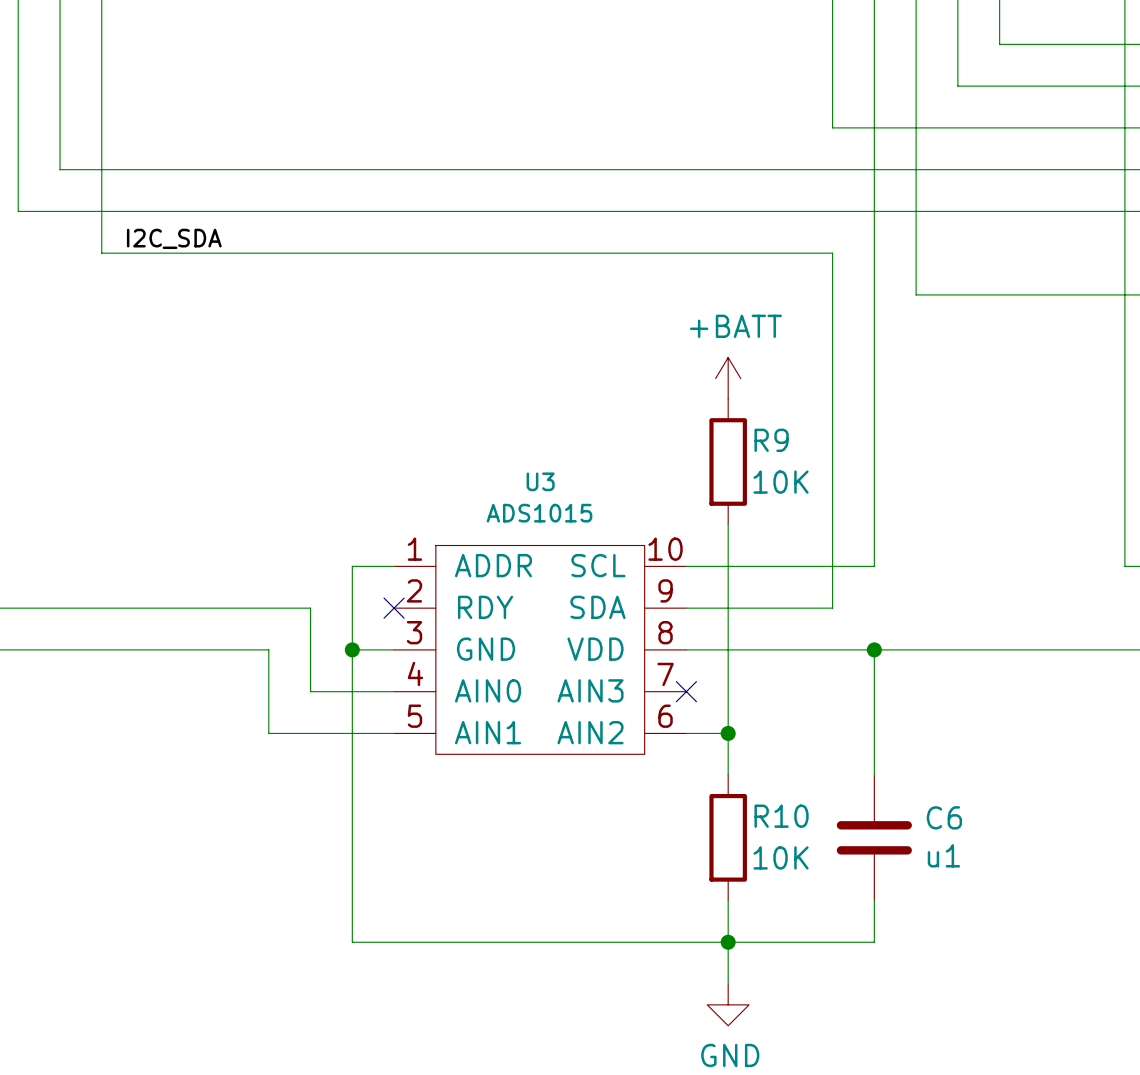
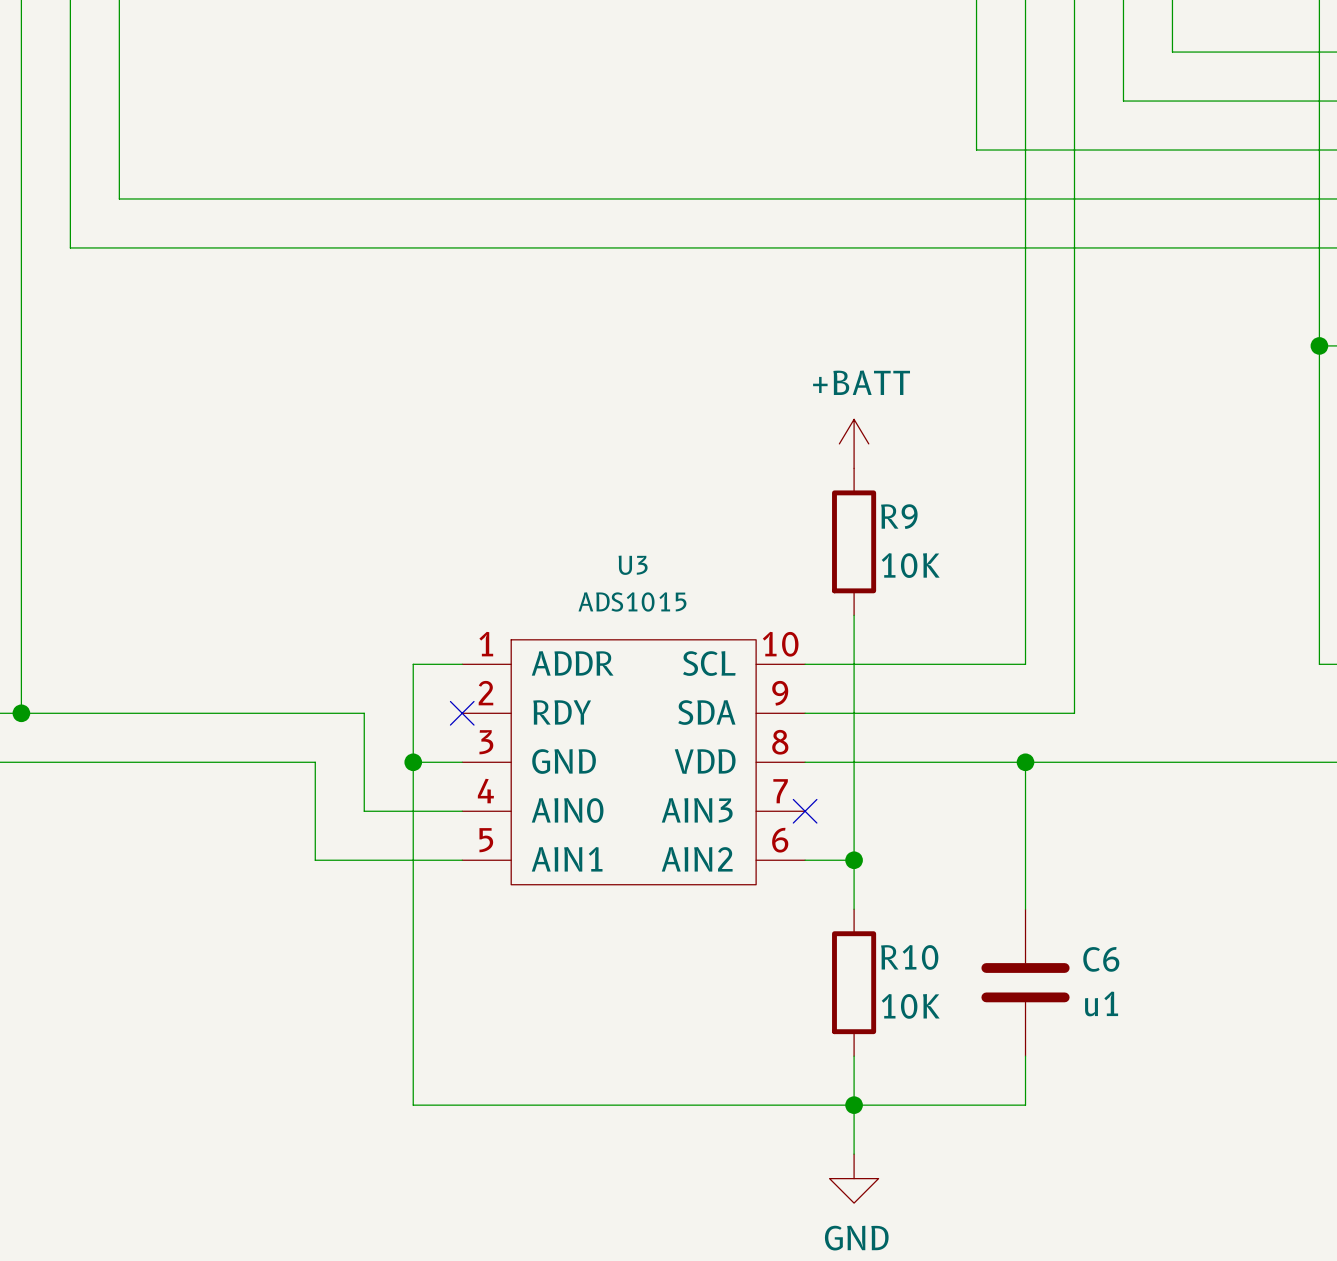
wire: (59, 169) (101, 169) (101, 253) (832, 253) (832, 608) -> none
wire: (18, 211) (59, 211) -> (70, 198) (70, 247)
wire: none -> (21, 247) (21, 713)
label: I2C_SDA (174, 238) -> none
wire: (916, 294) (1124, 294) -> (1074, 345) (1074, 713) (976, 713)
junction: none -> (1319, 345)
junction: none -> (21, 713)

